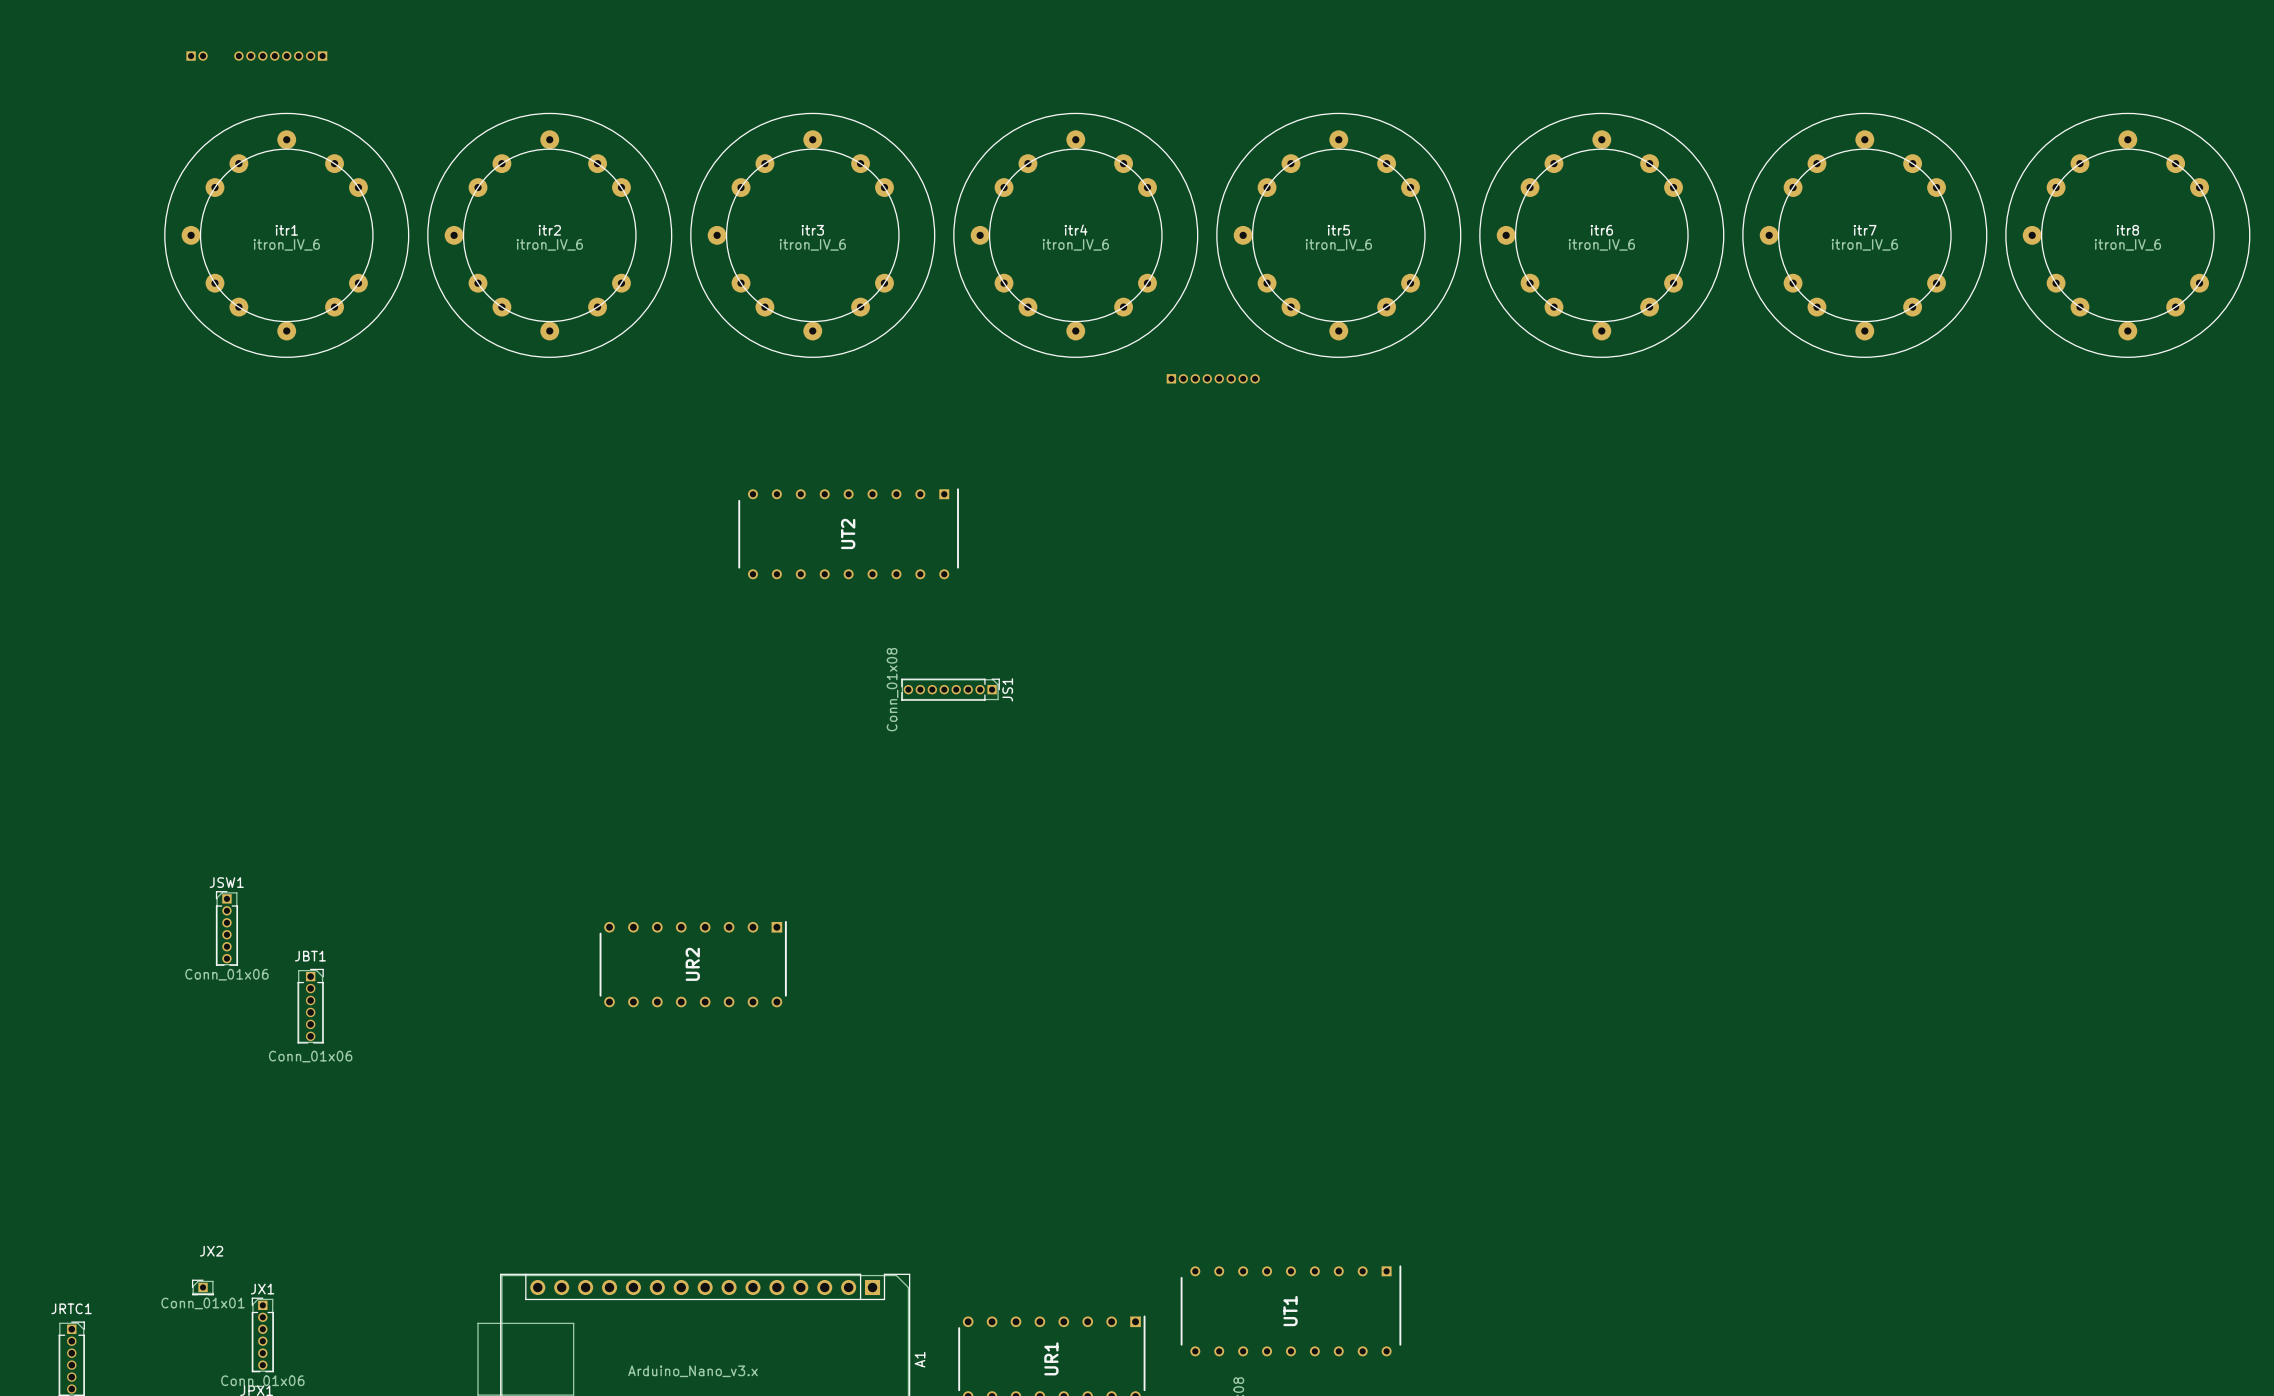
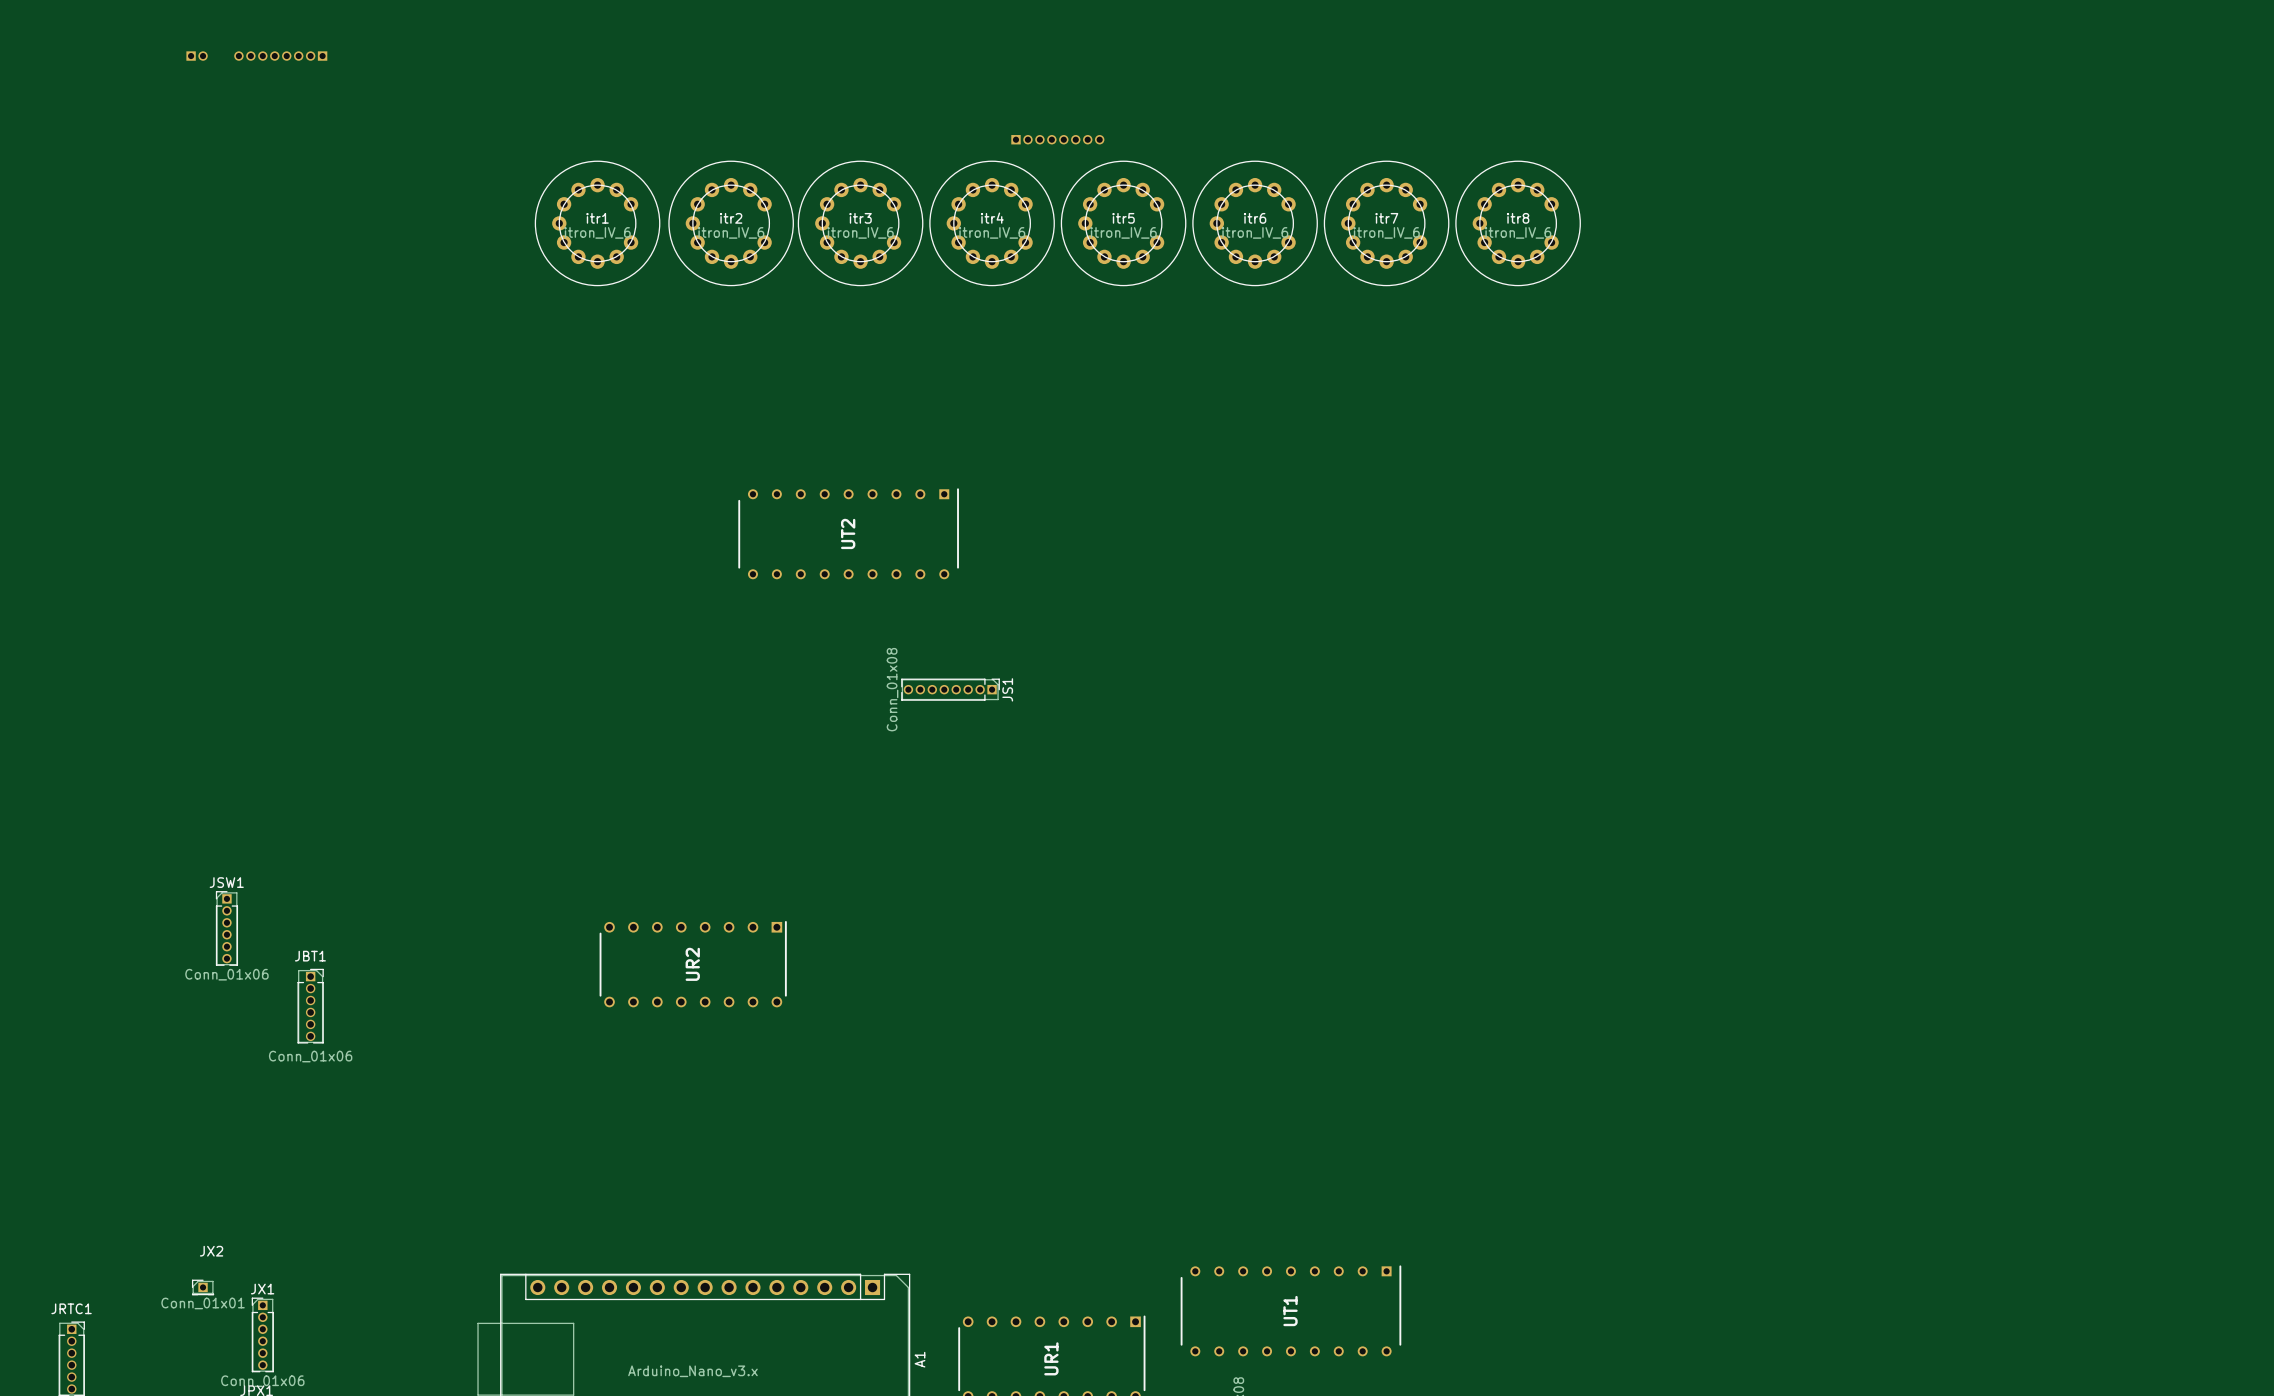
itr1 footprint: [164, 112, 410, 358] -> [534, 160, 661, 287]
itr2 footprint: [427, 112, 673, 358] -> [668, 160, 794, 287]
itr3 footprint: [690, 112, 936, 358] -> [797, 160, 924, 287]
itr4 footprint: [953, 112, 1199, 358] -> [929, 160, 1055, 287]
itr5 footprint: [1216, 112, 1462, 358] -> [1060, 160, 1187, 287]
itr6 footprint: [1479, 112, 1725, 358] -> [1192, 160, 1318, 287]
itr7 footprint: [1742, 112, 1988, 358] -> [1323, 160, 1450, 287]
itr8 footprint: [2005, 112, 2251, 358] -> [1455, 160, 1581, 287]
part: none -> (1057, 139)
part: (1213, 378) -> none

